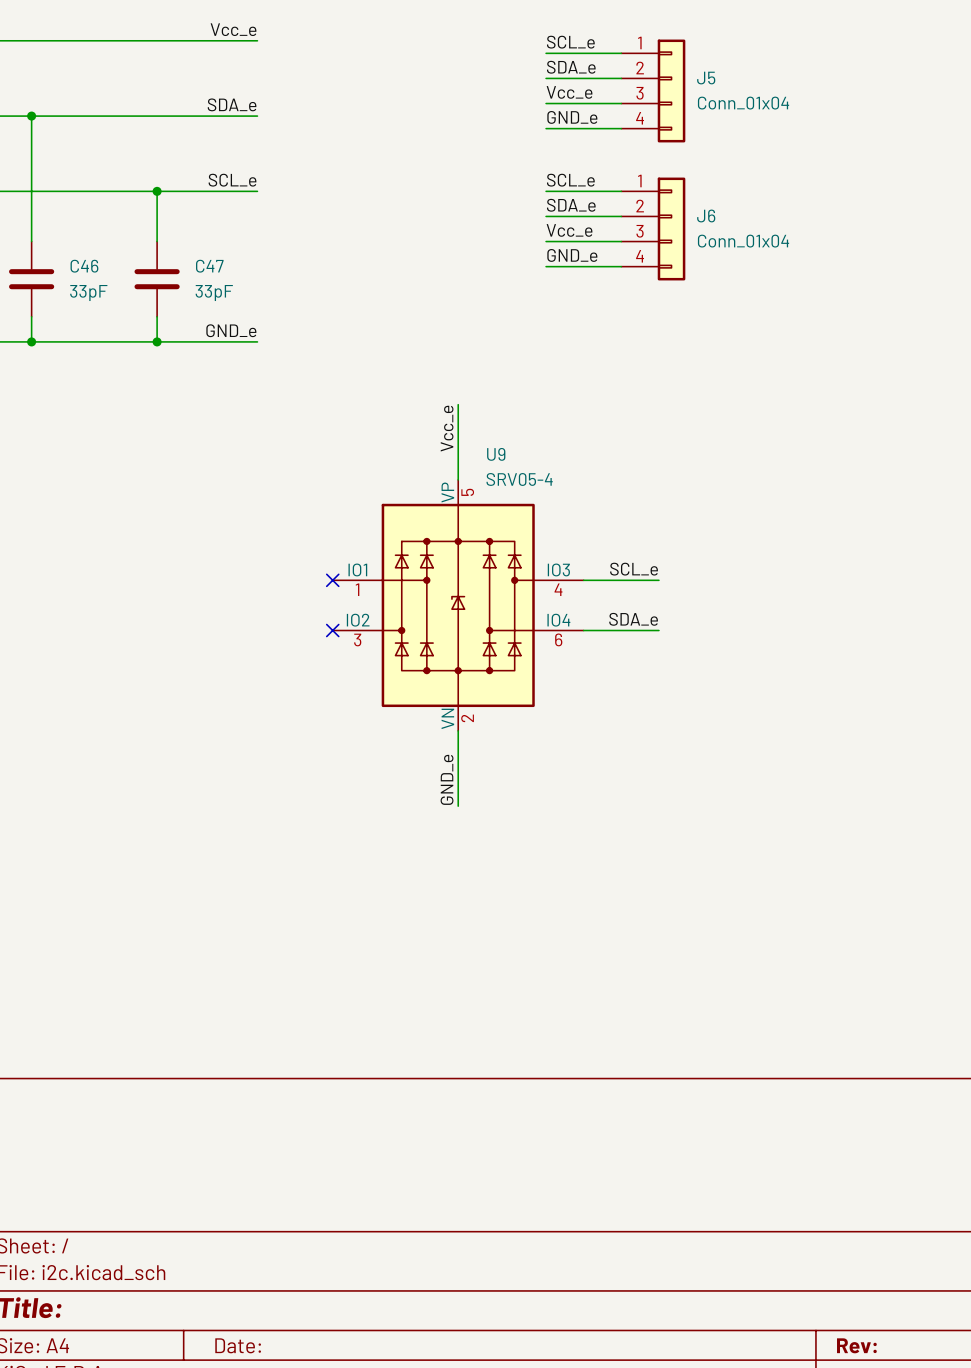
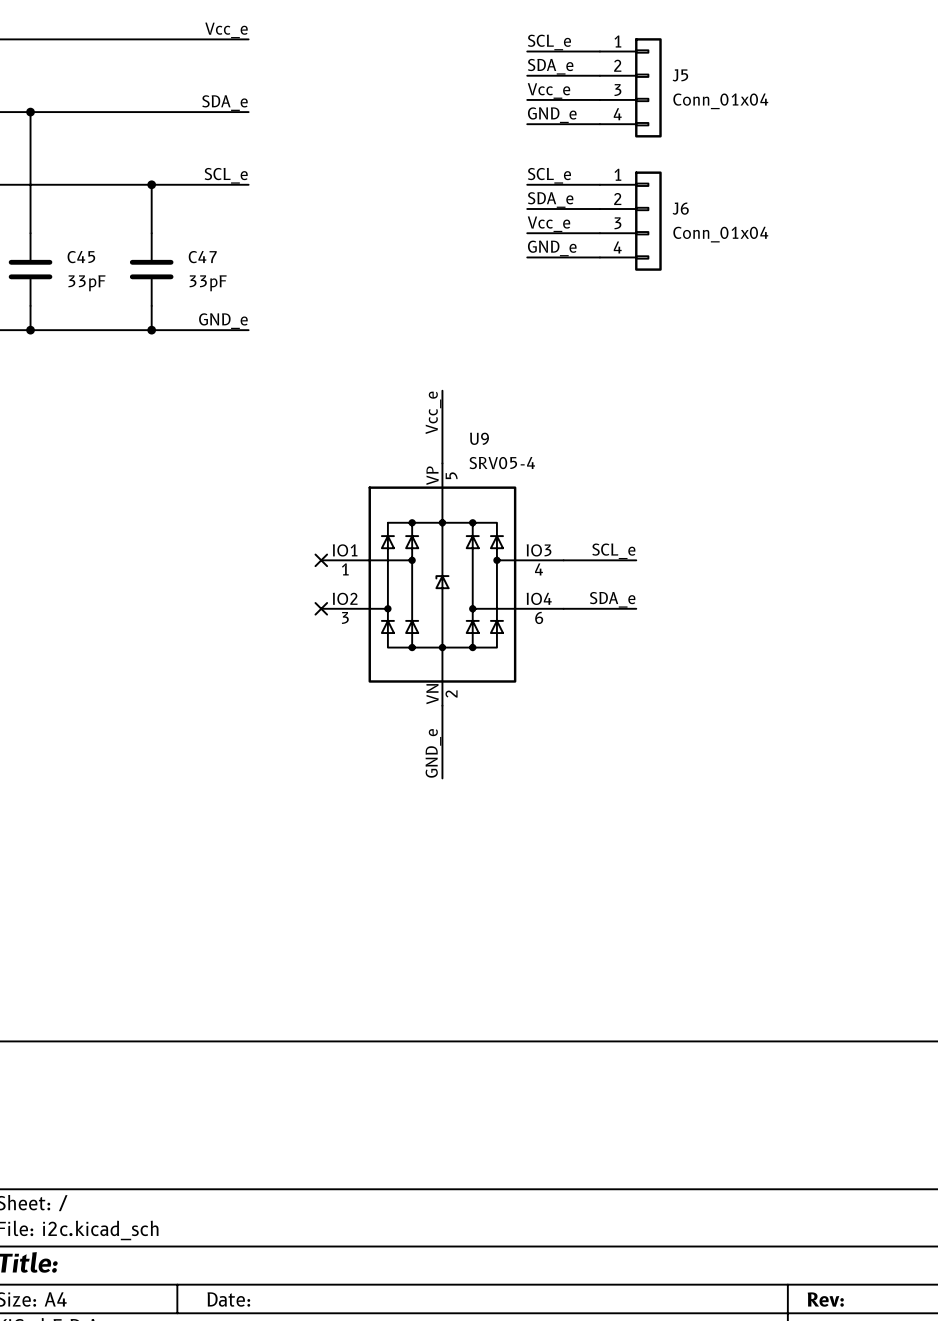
C46 name: C46 (84, 266) -> C45 (81, 257)

